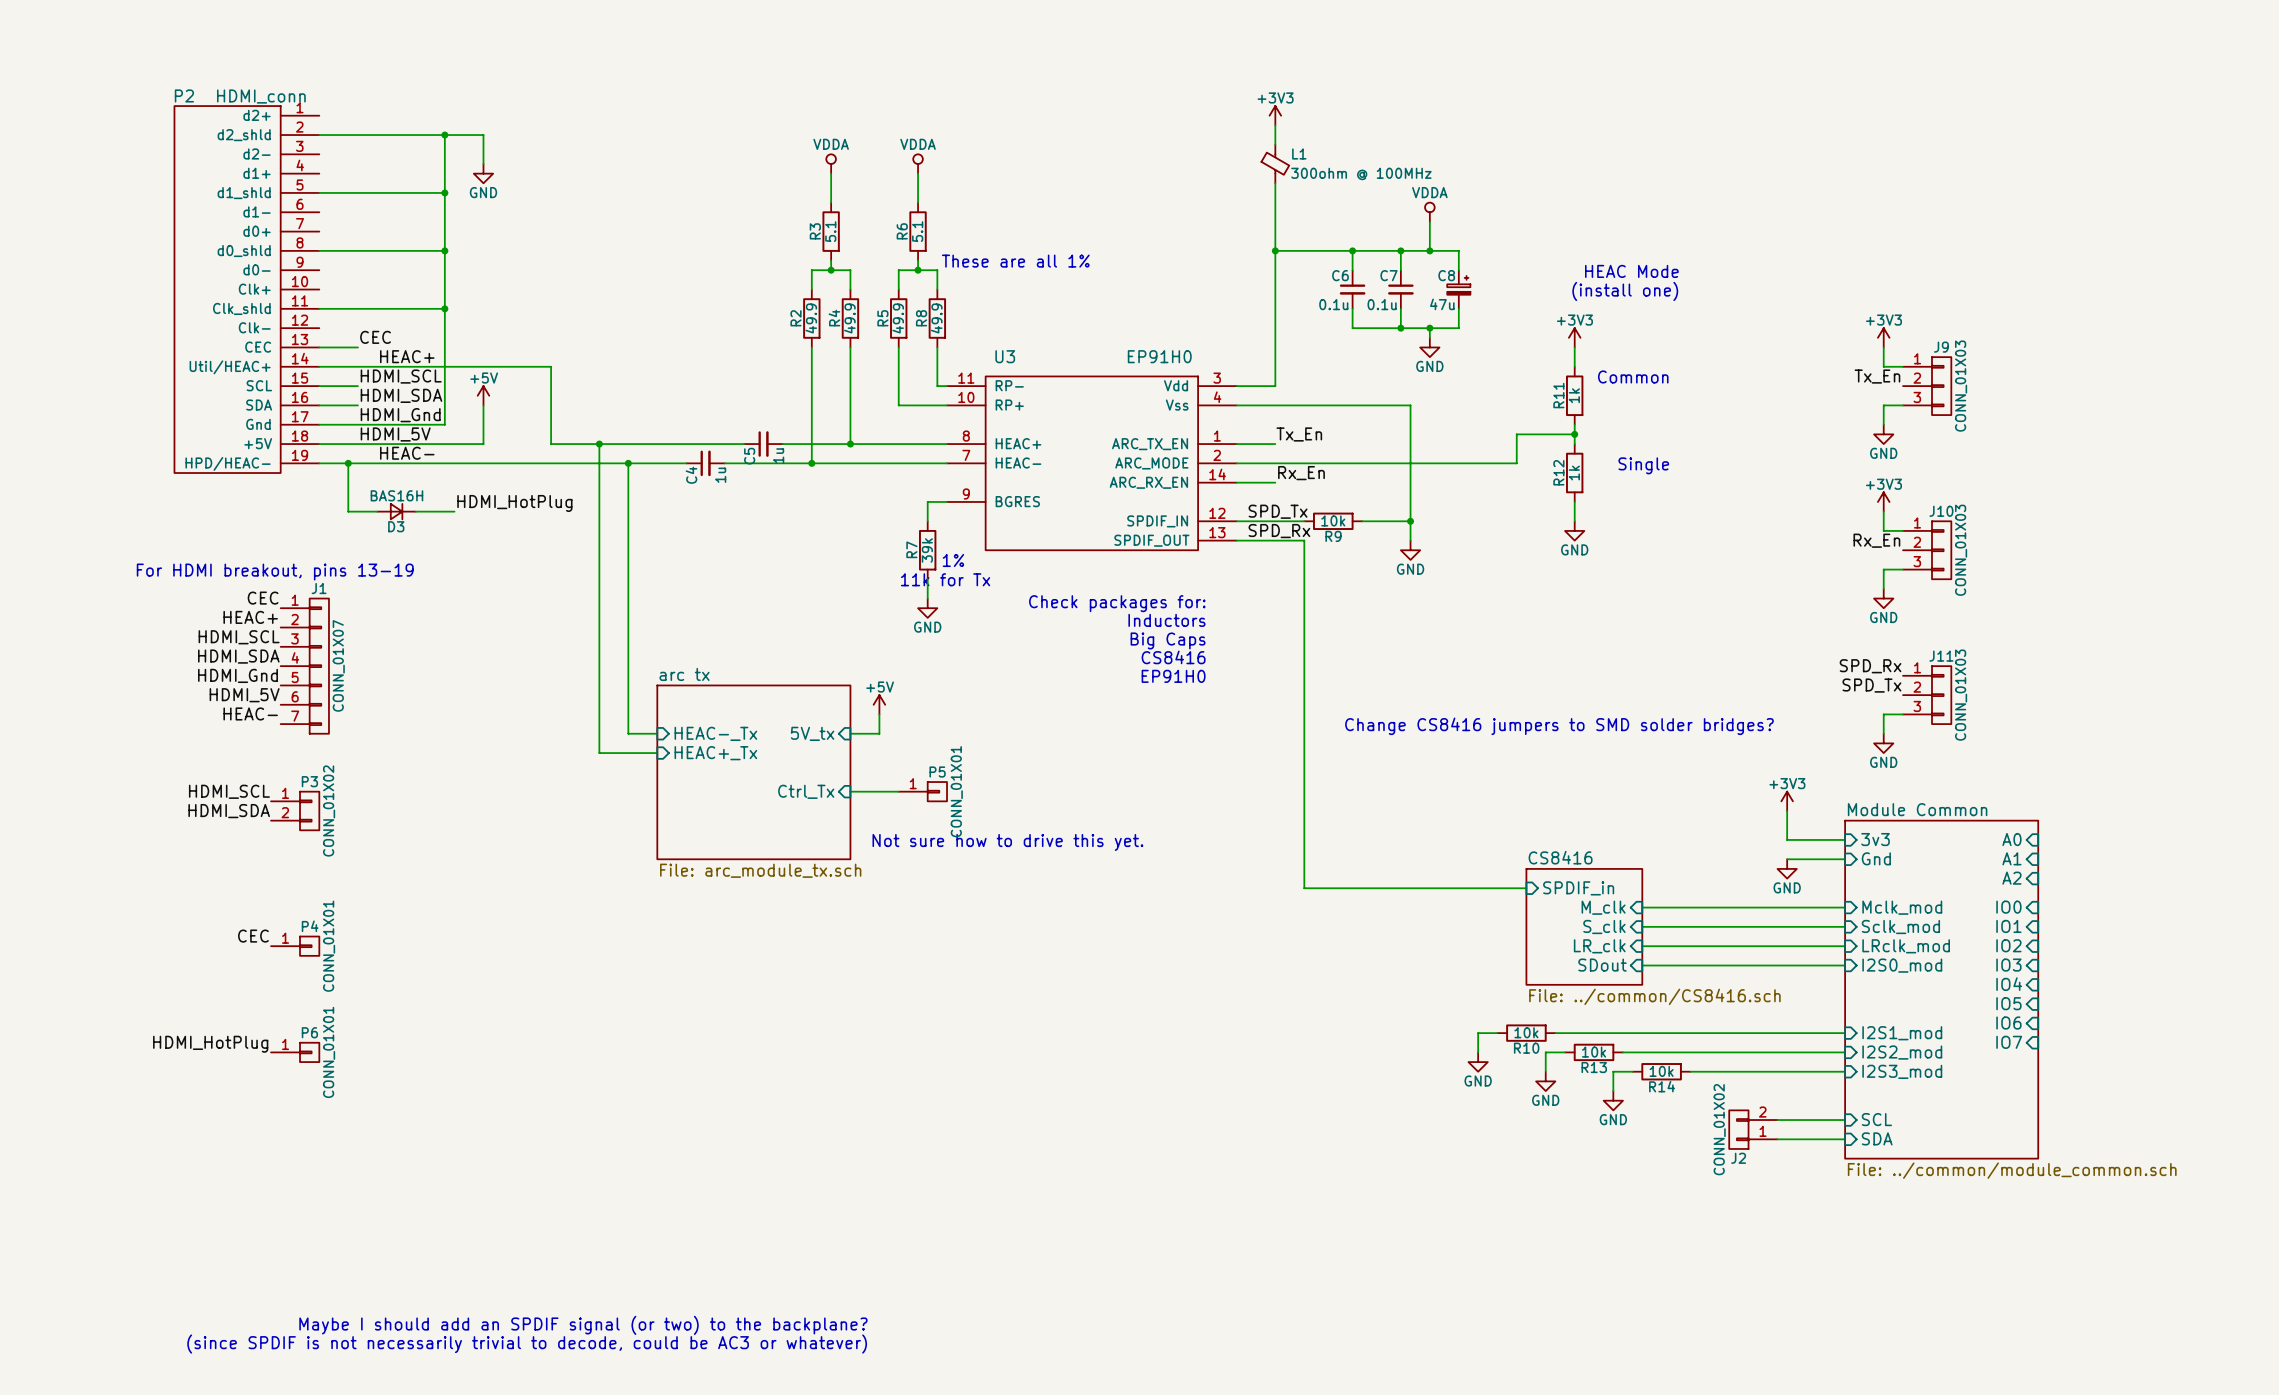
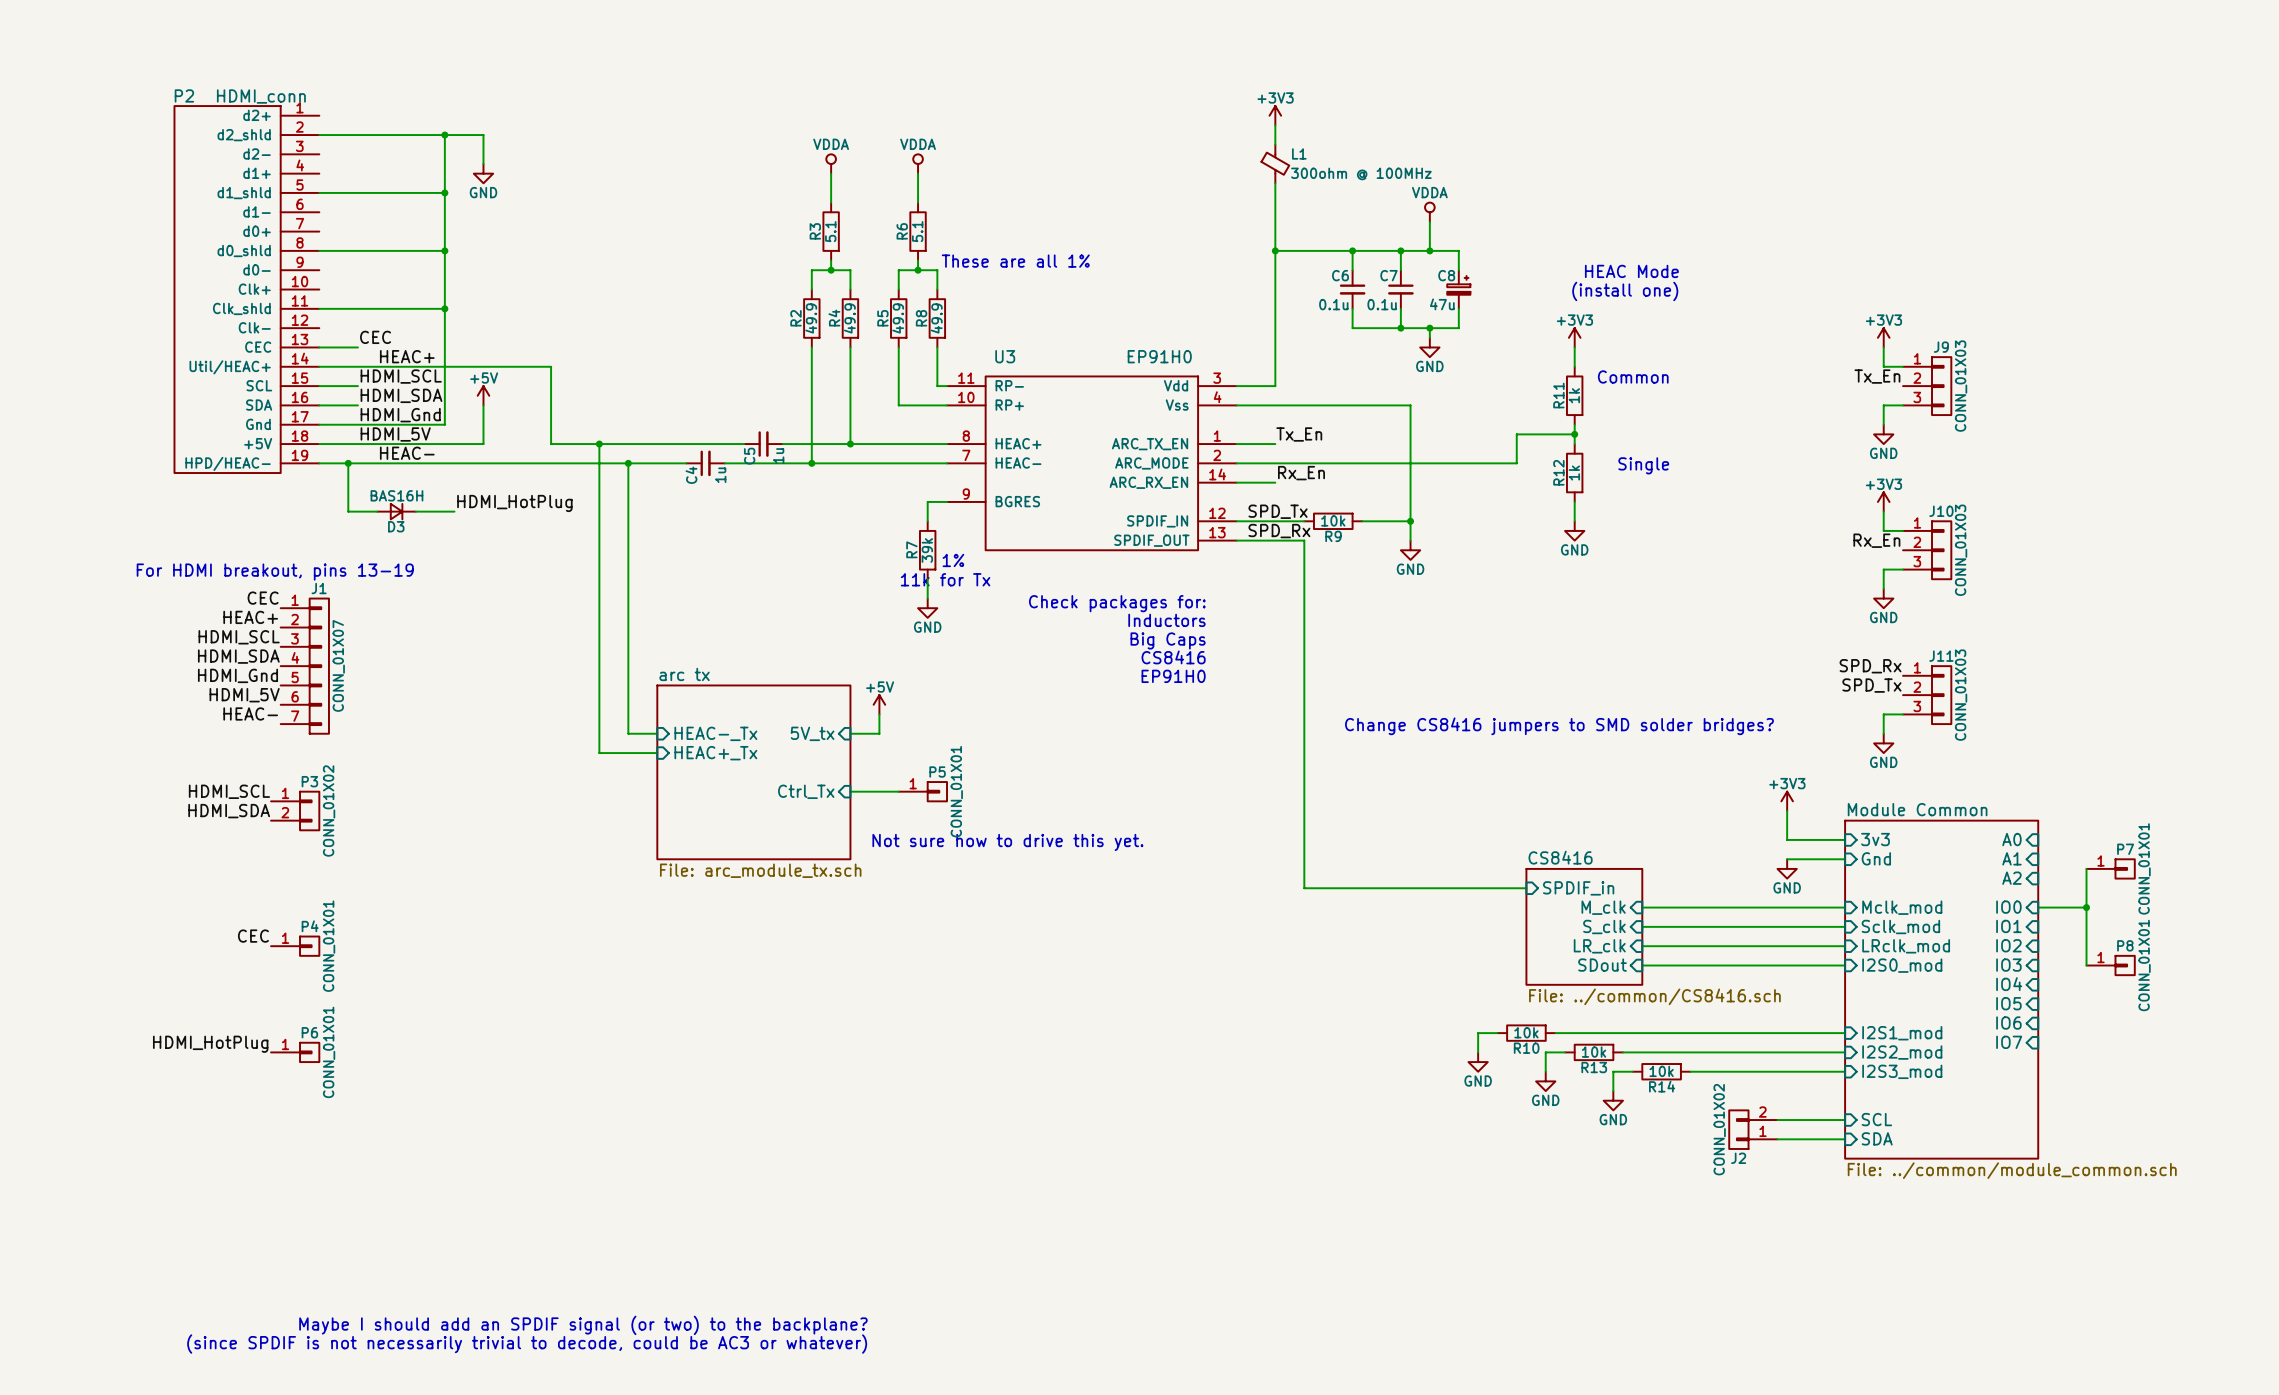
wire: none -> (2086, 868) (2086, 965)
P7: none -> CONN_01X01 (2110, 868)
wire: none -> (2038, 907) (2086, 907)
junction: none -> (2086, 907)
P8: none -> CONN_01X01 (2110, 965)

